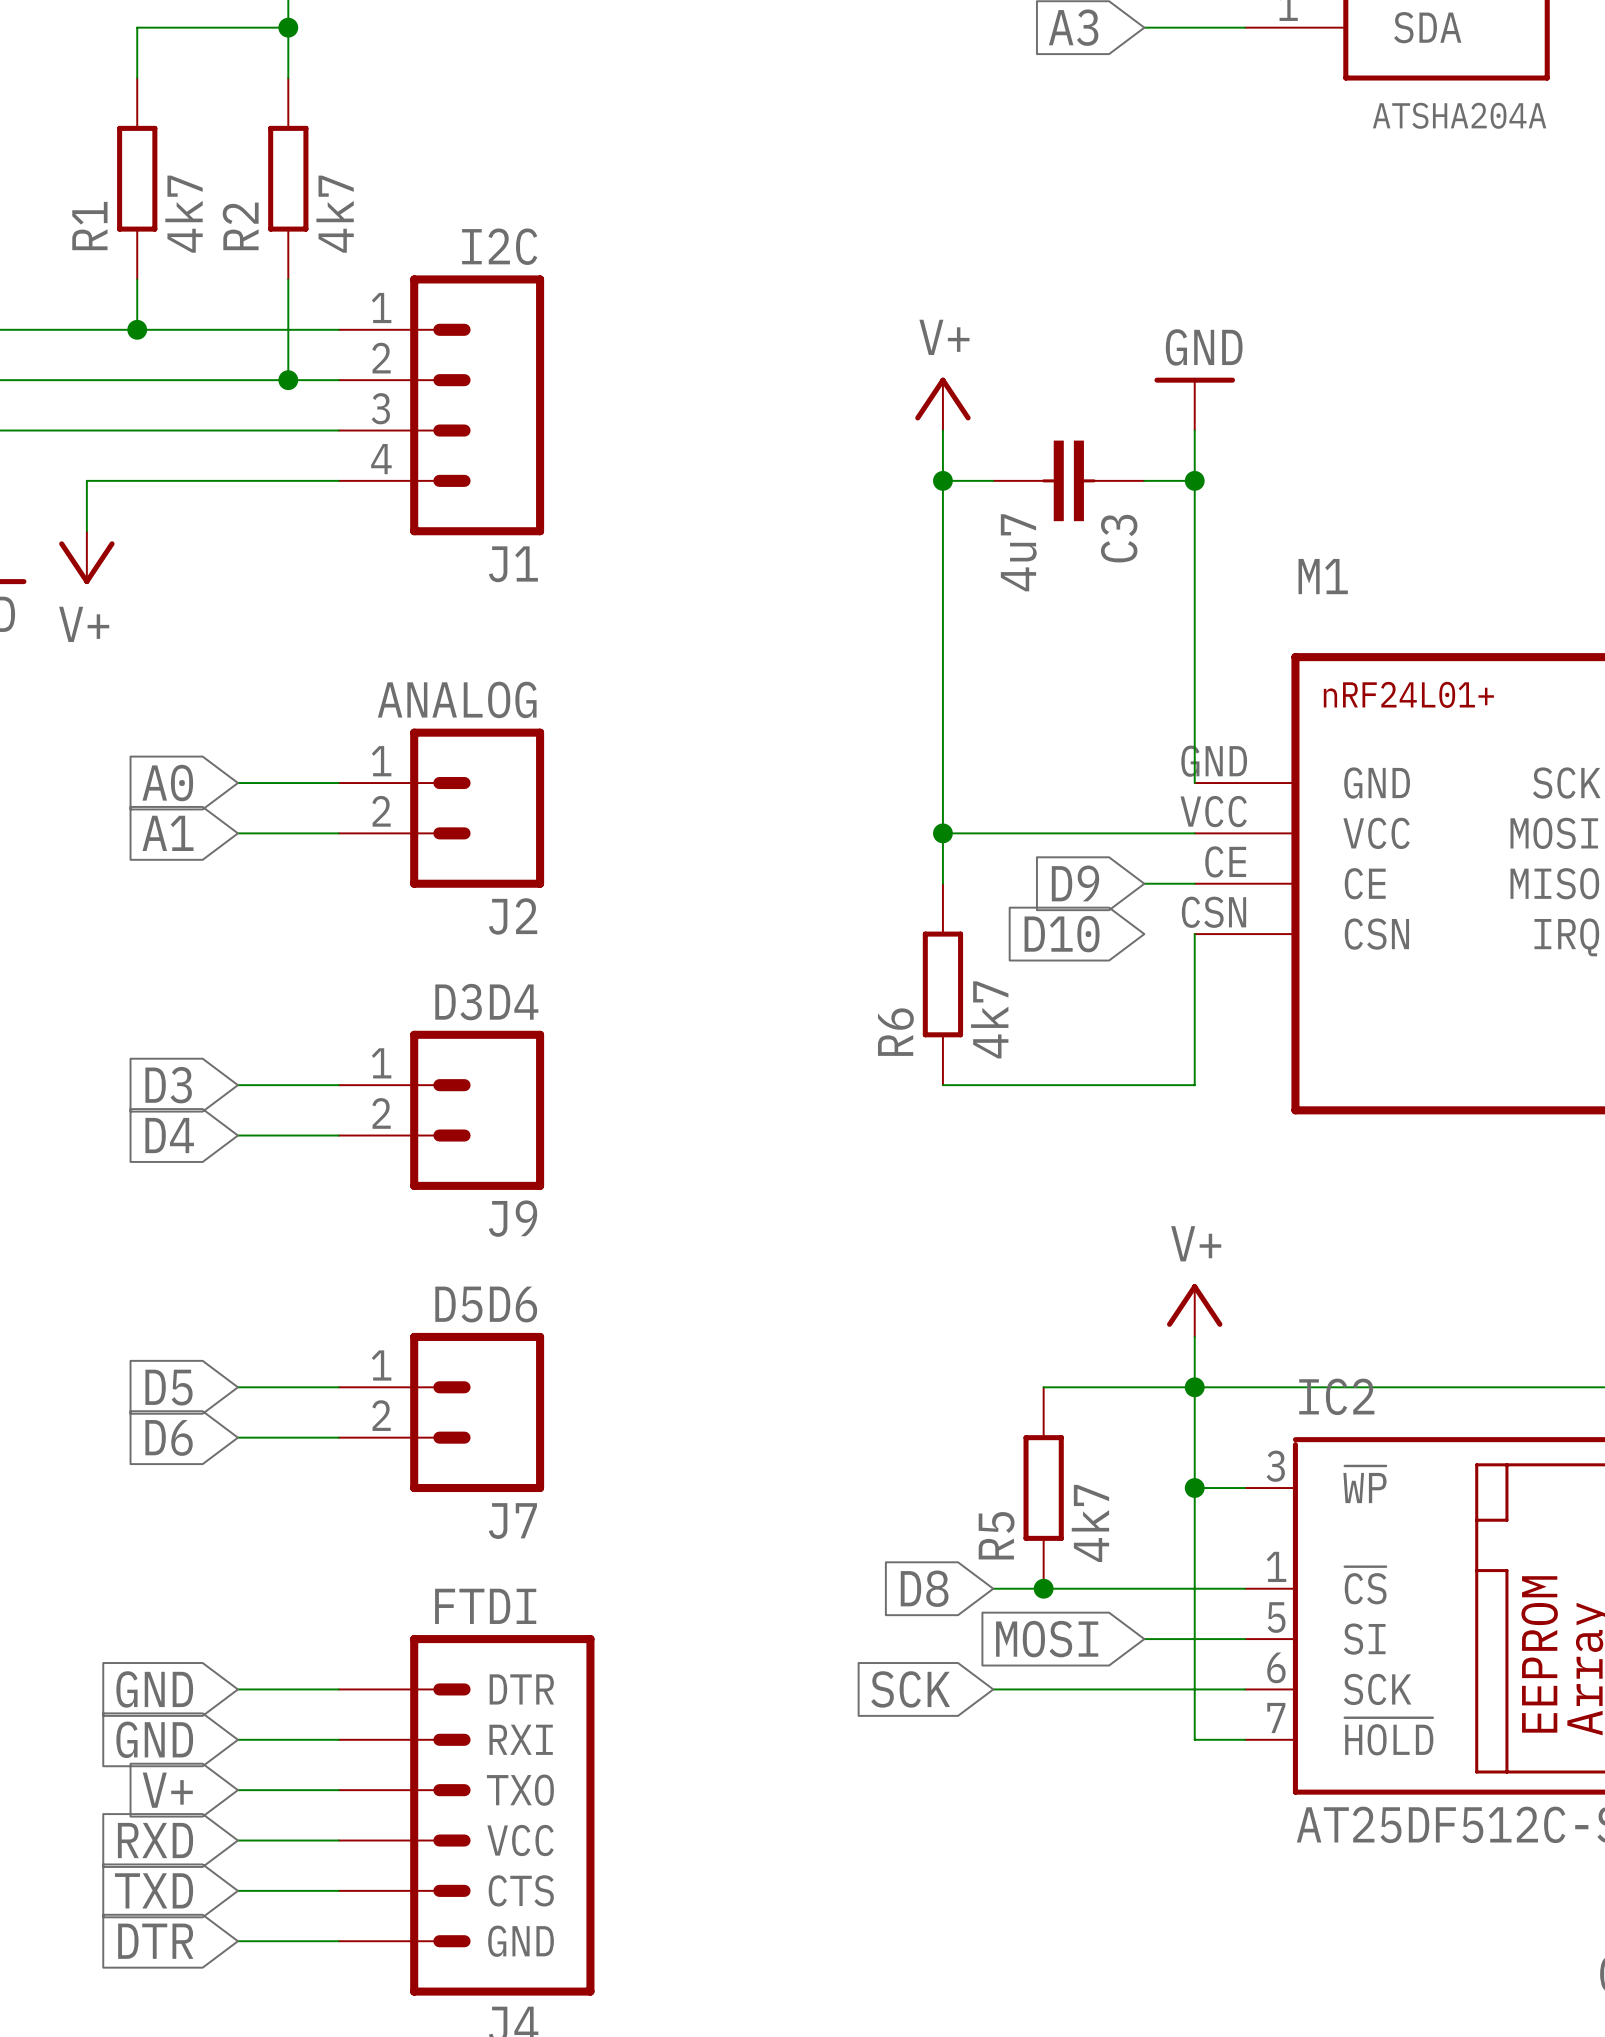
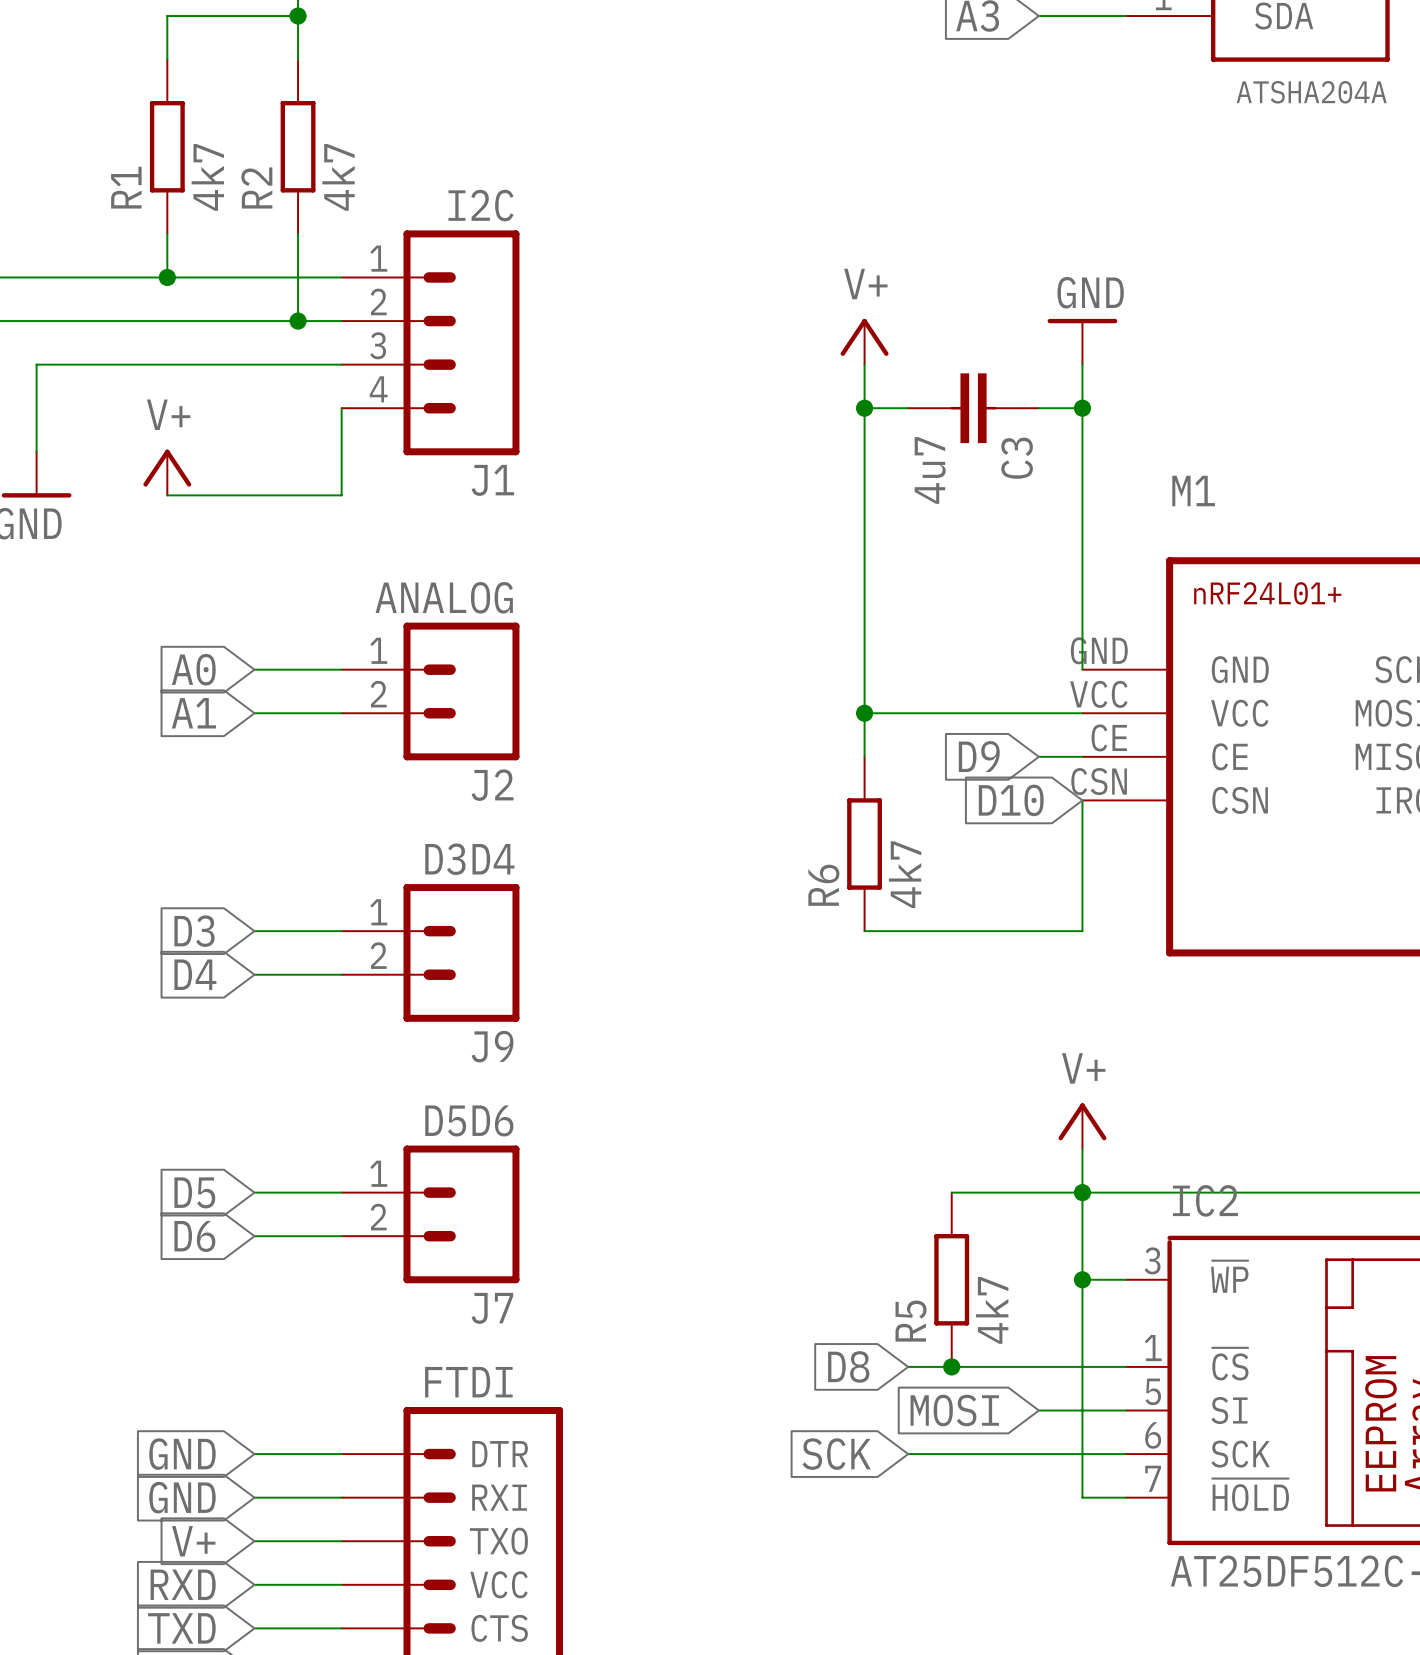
wire: (338, 480) (86, 480) (86, 531) -> (341, 408) (341, 495) (167, 495)
power symbol position: V+ (86, 557) -> V+ (167, 472)
power symbol rotation: 0° (86, 562) -> 180° (167, 468)
global label position: D10 (1062, 934) -> D10 (1011, 800)

